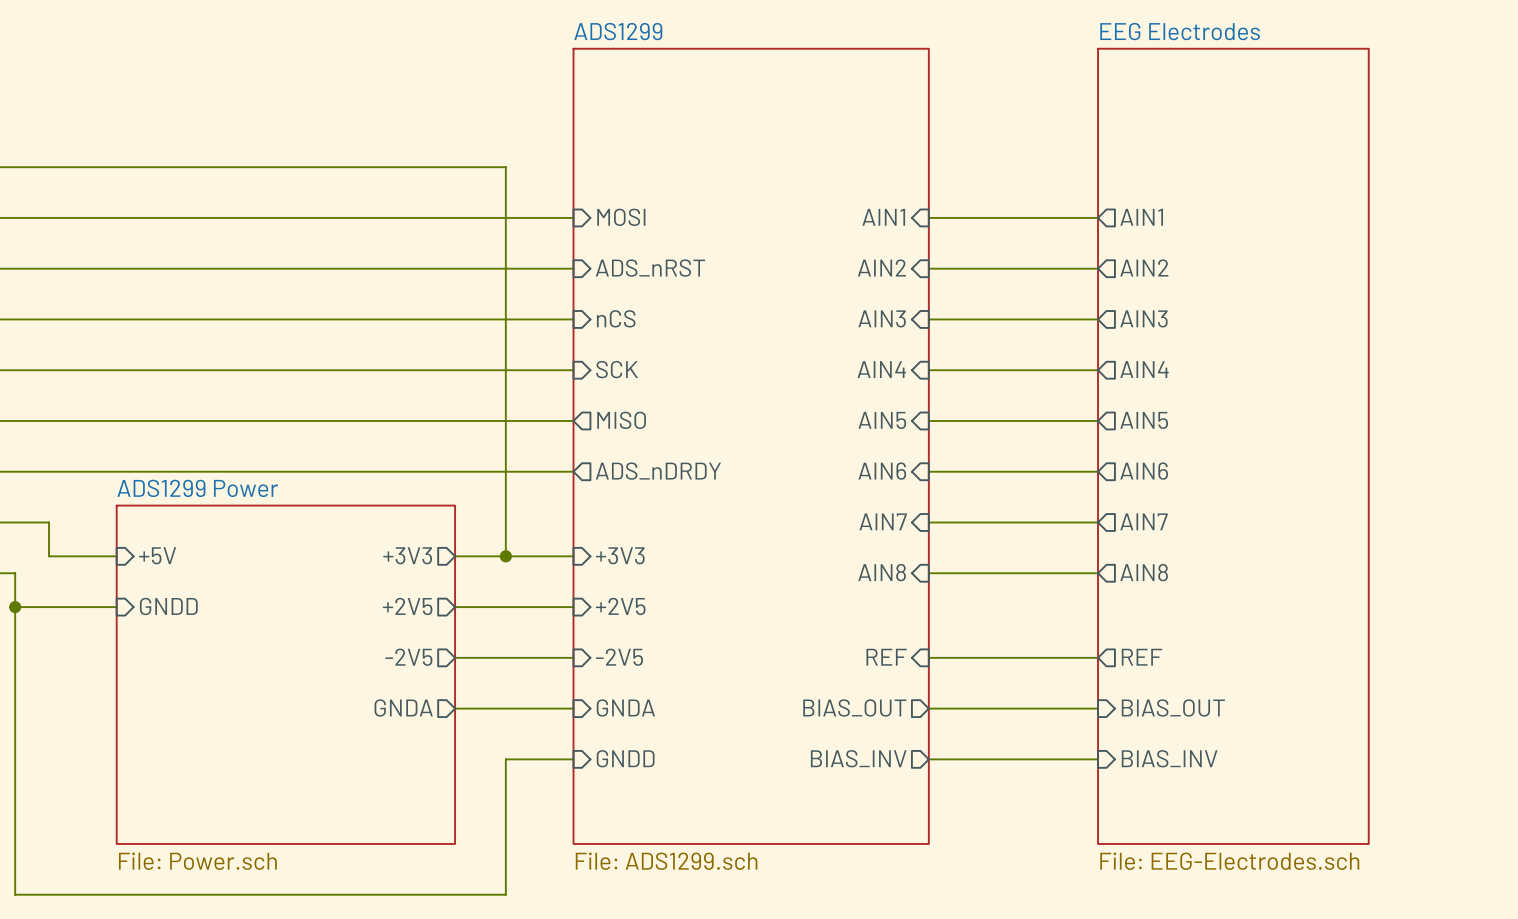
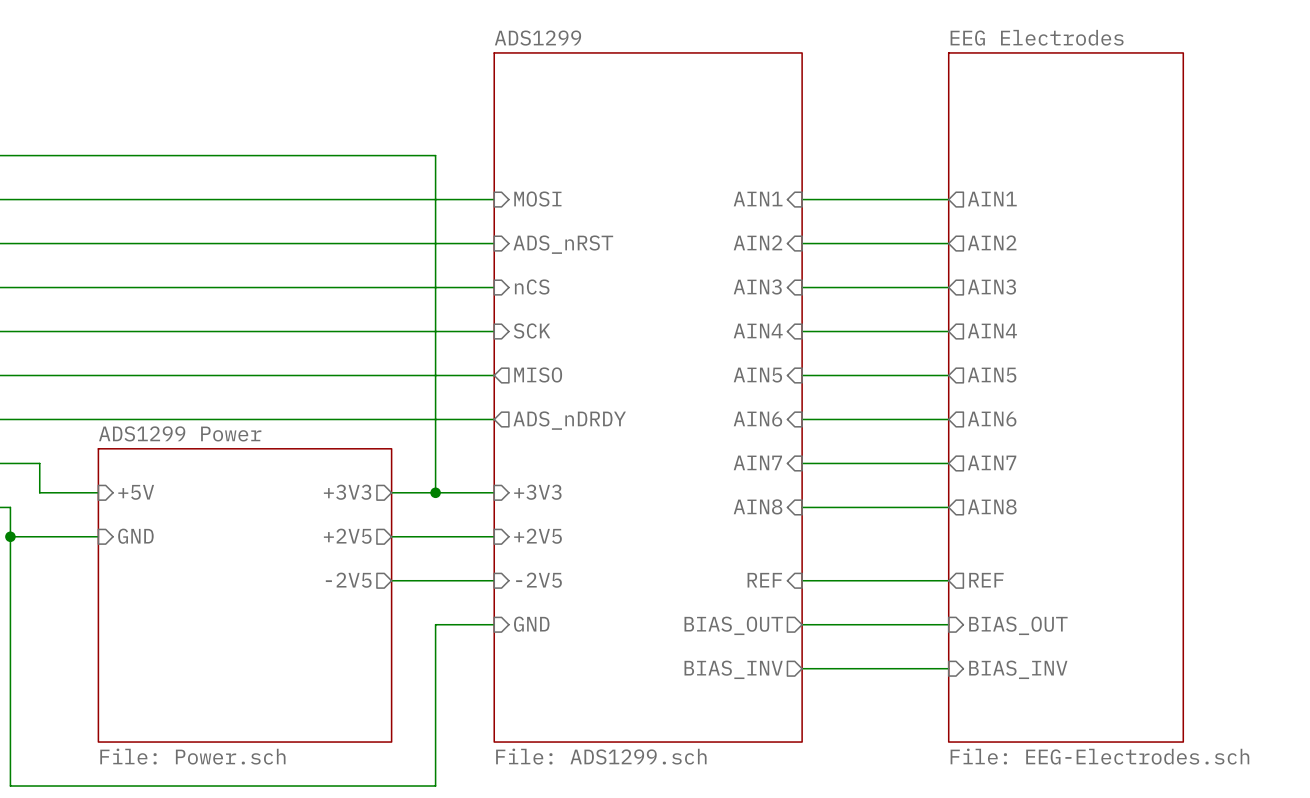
sheet pin: GNDD (168, 606) -> GND (135, 536)
sheet pin: GNDA (403, 707) -> none
sheet pin: GNDA (625, 707) -> GND (531, 624)
wire: (455, 708) (505, 708) -> (435, 668) (435, 624)
sheet pin: GNDD (625, 758) -> none
wire: (505, 759) (573, 759) -> none

